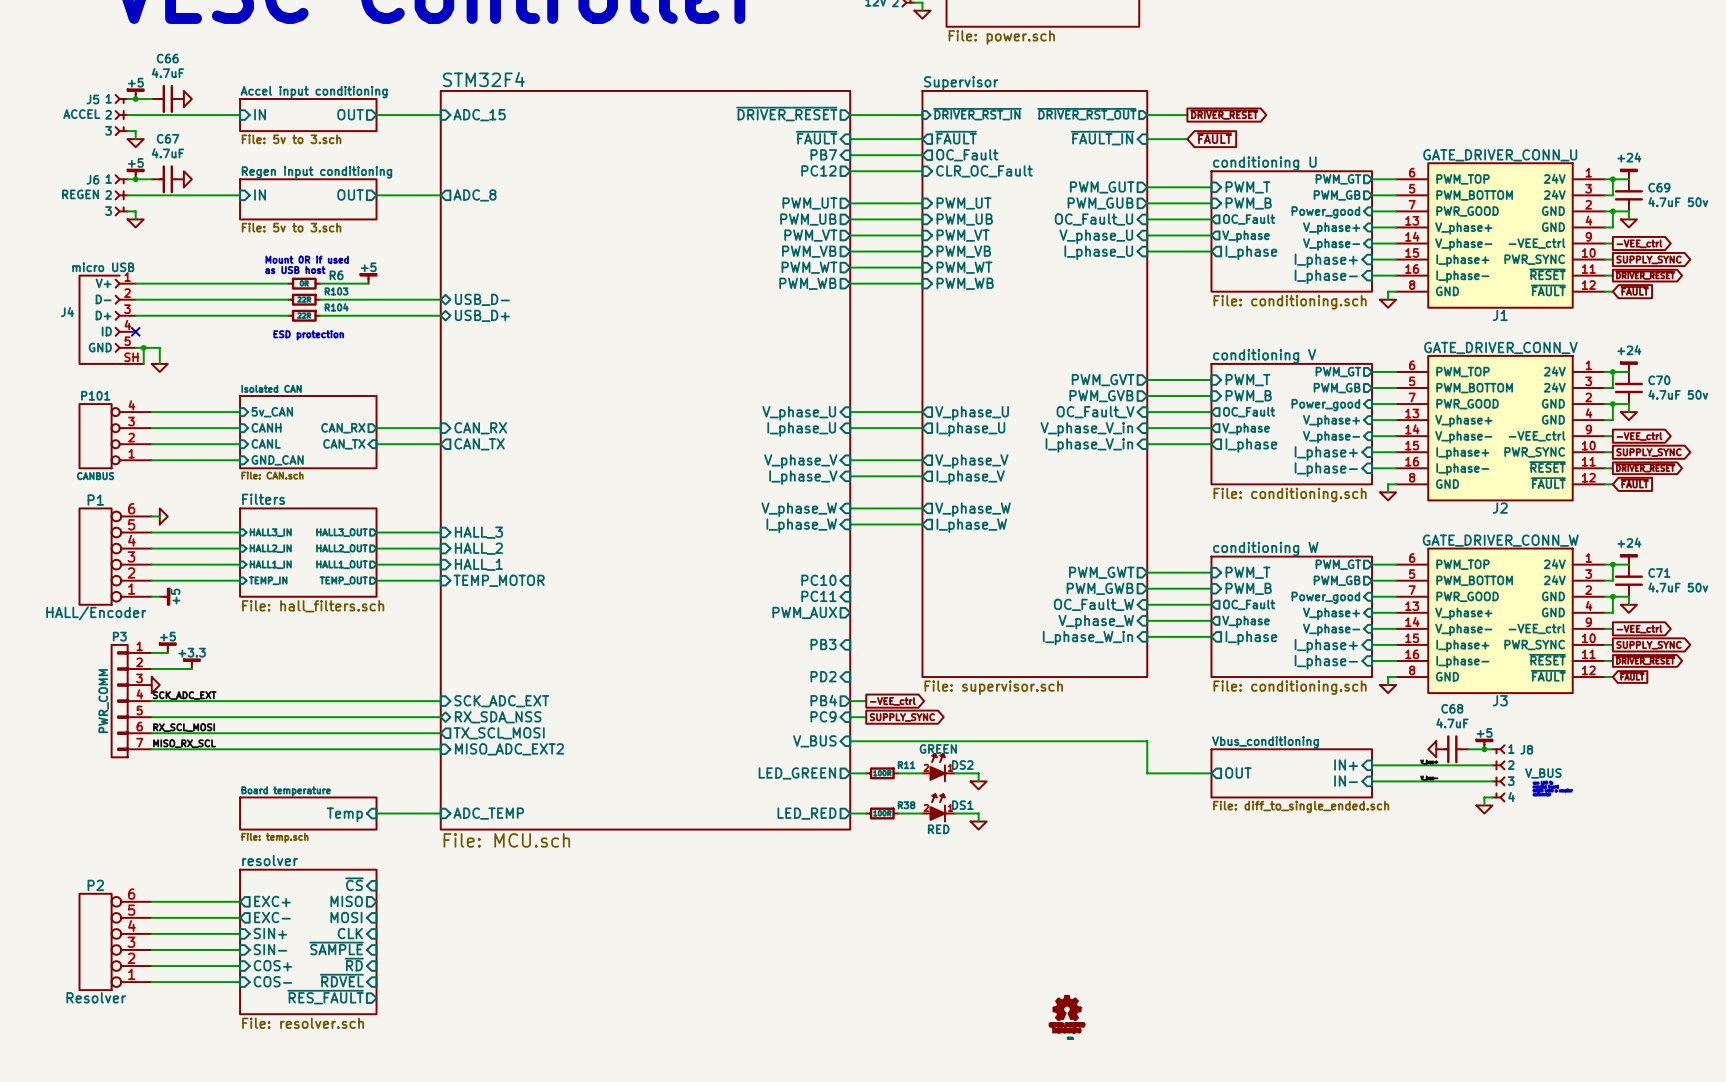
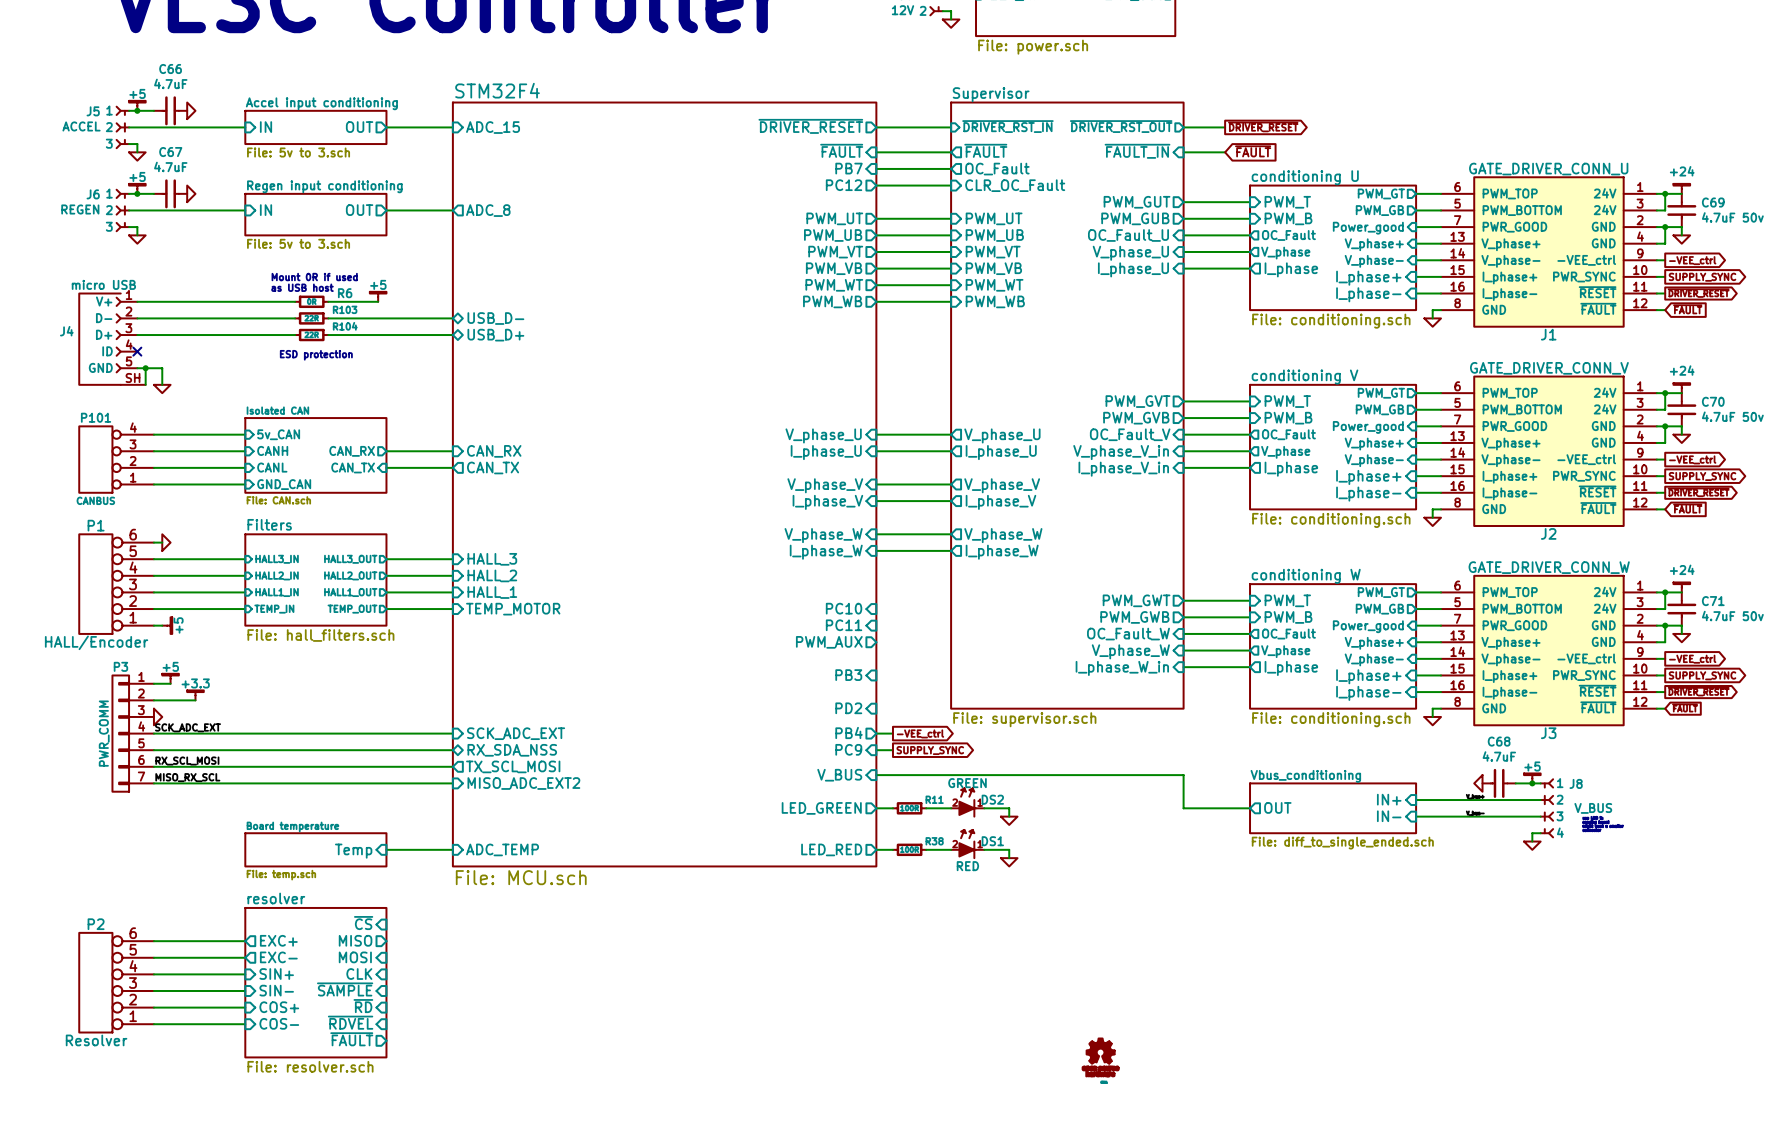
sheet pin: ~{RES_FAULT} (325, 997) -> ~{FAULT} (351, 1039)

